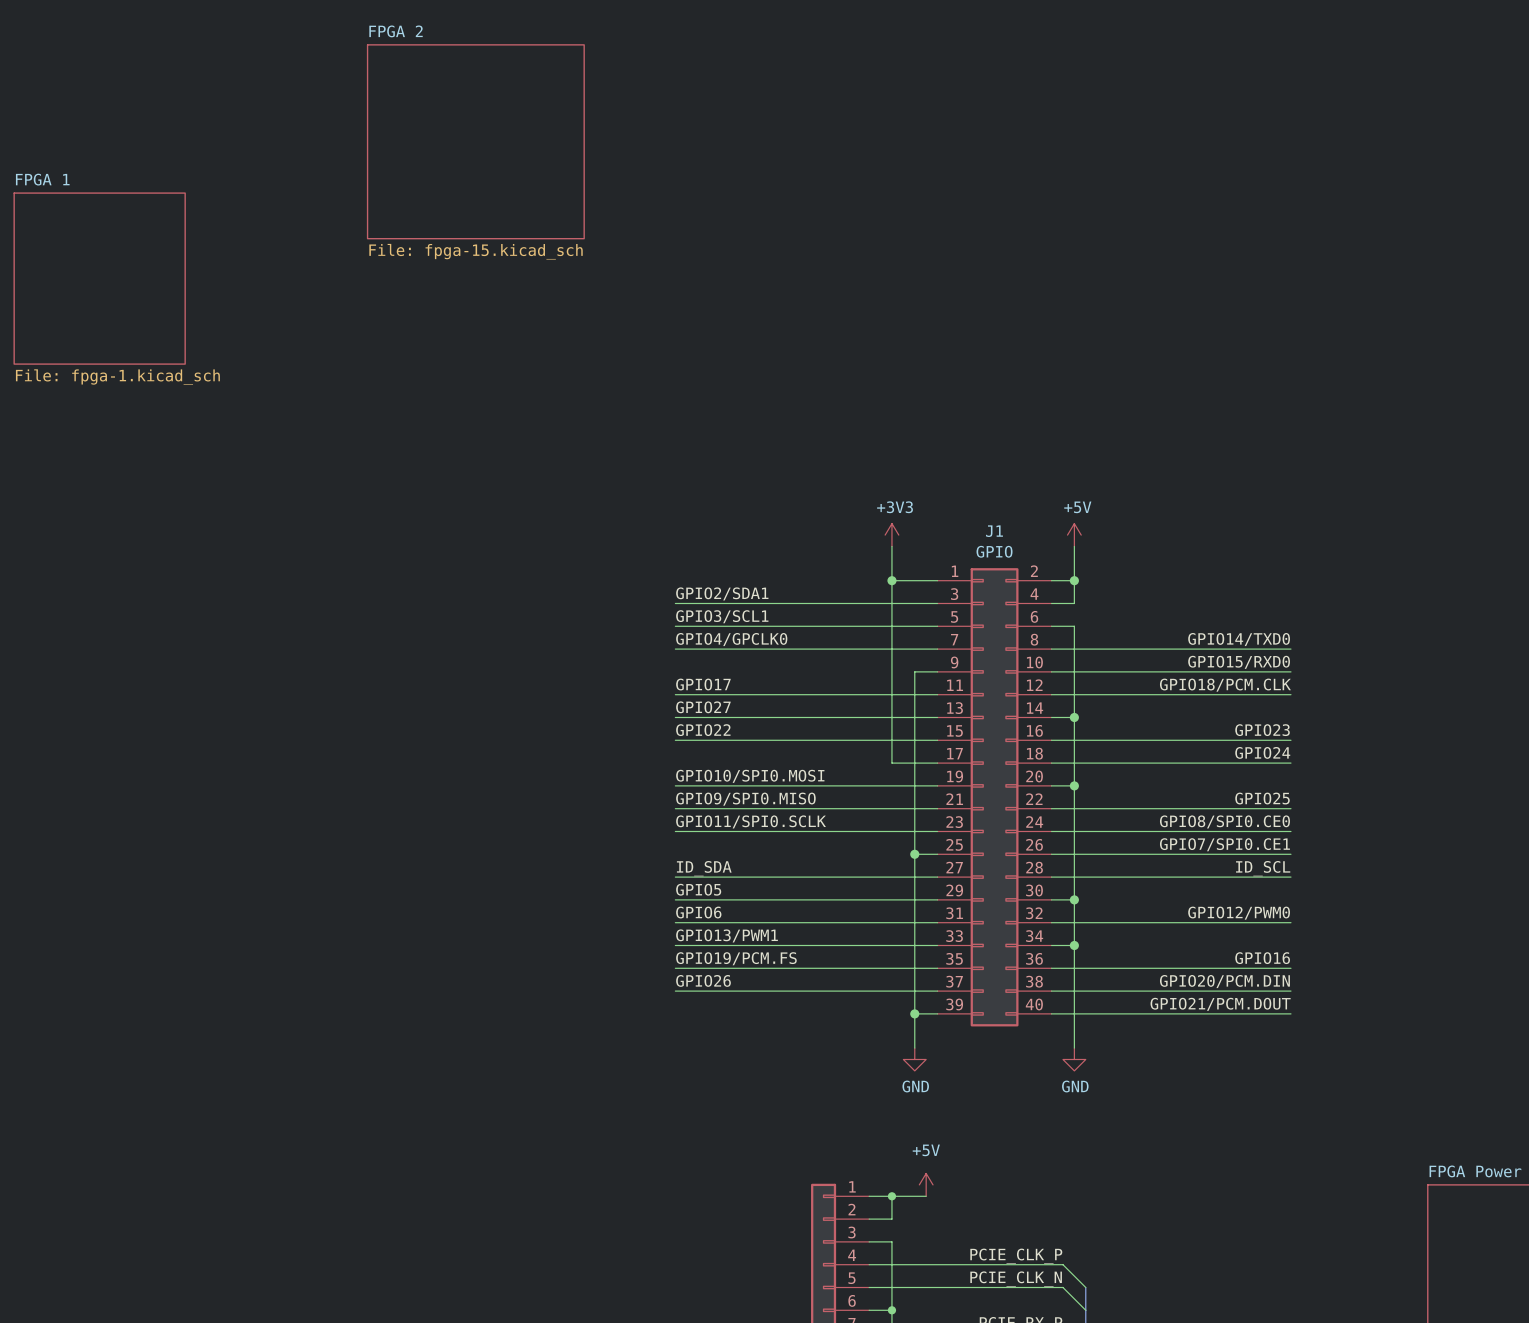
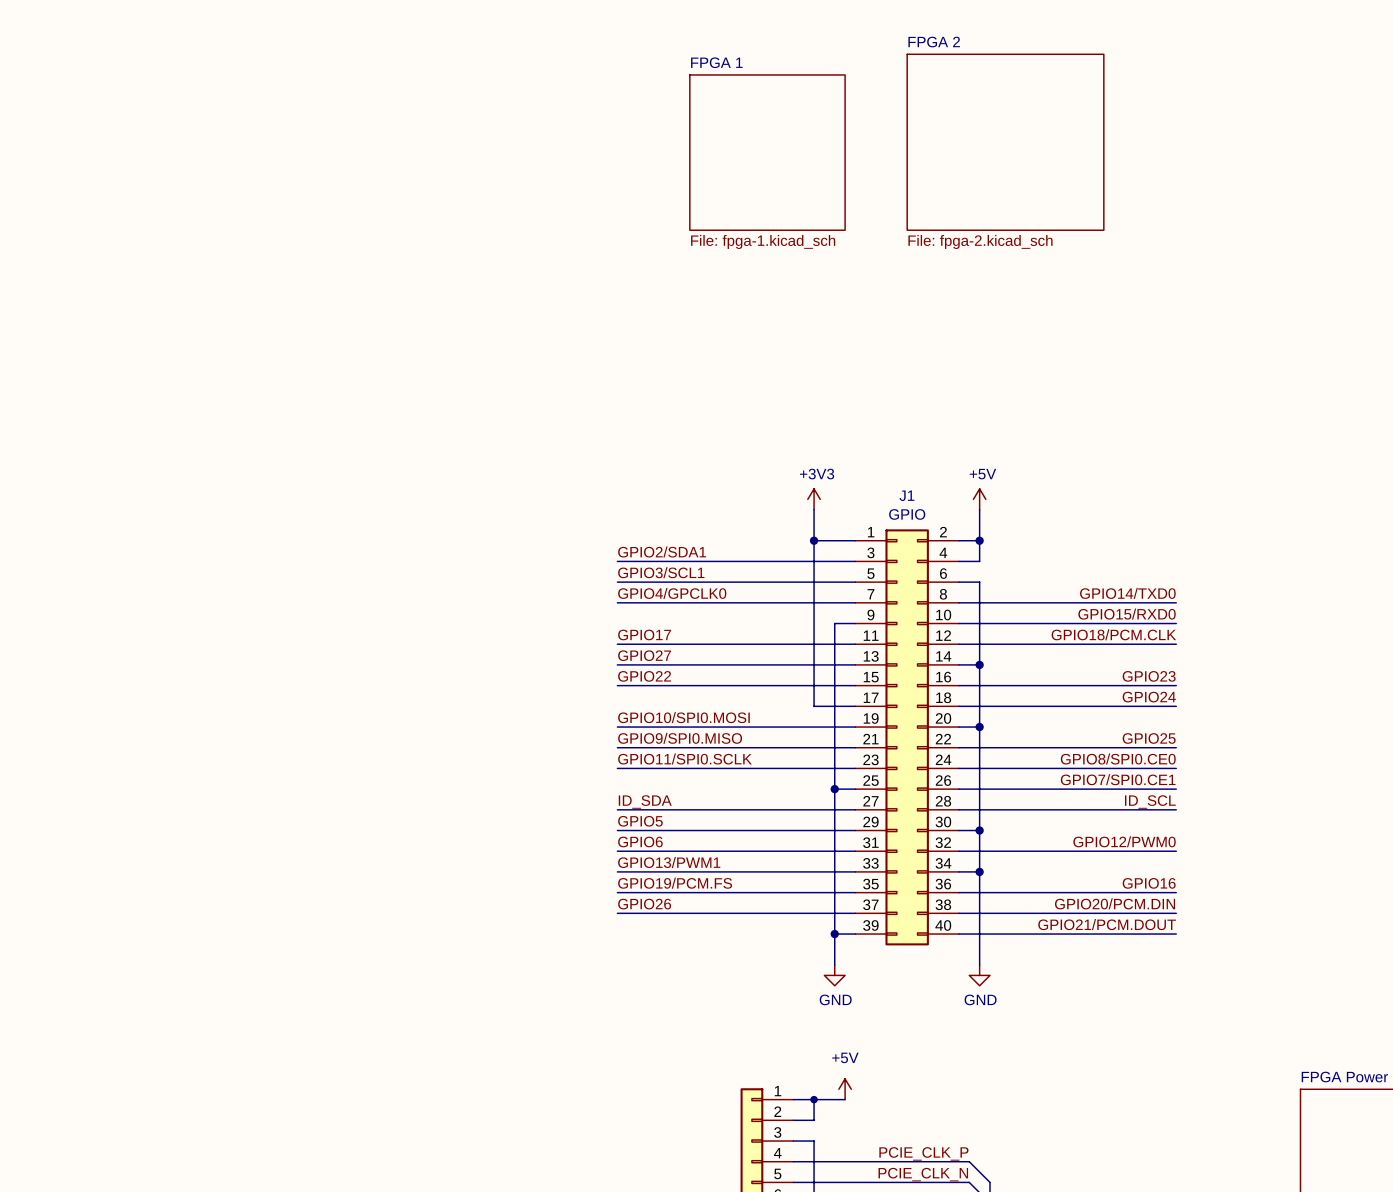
sheet FPGA 2 position: (475, 141) -> (1005, 142)
sheet FPGA 2 value: File: fpga-15.kicad_sch (476, 251) -> File: fpga-2.kicad_sch (980, 241)
sheet FPGA 1 position: (99, 278) -> (767, 152)

